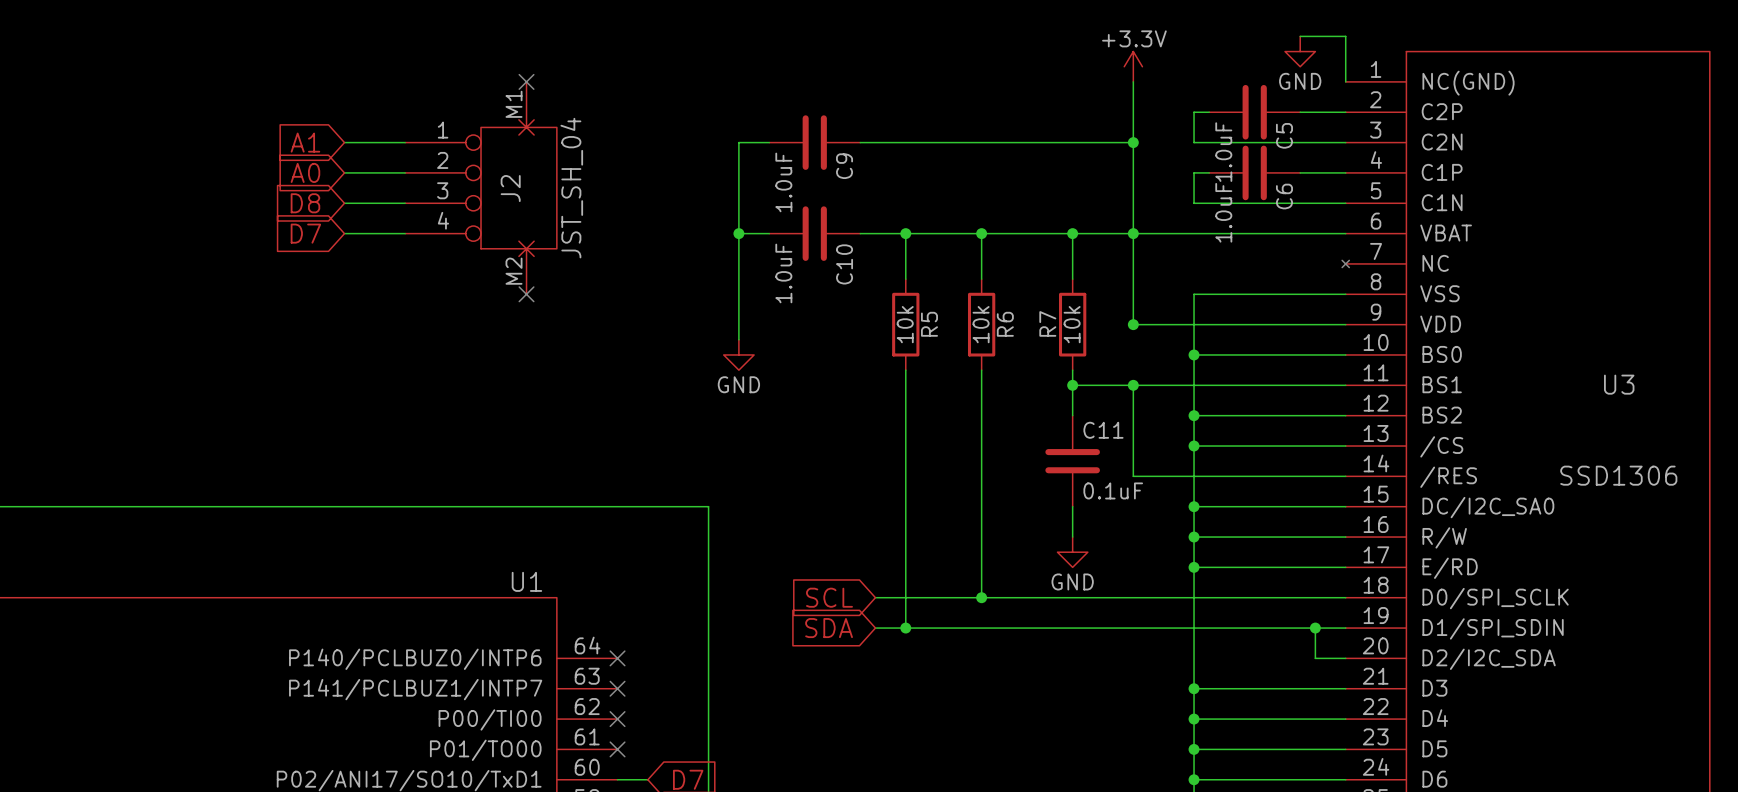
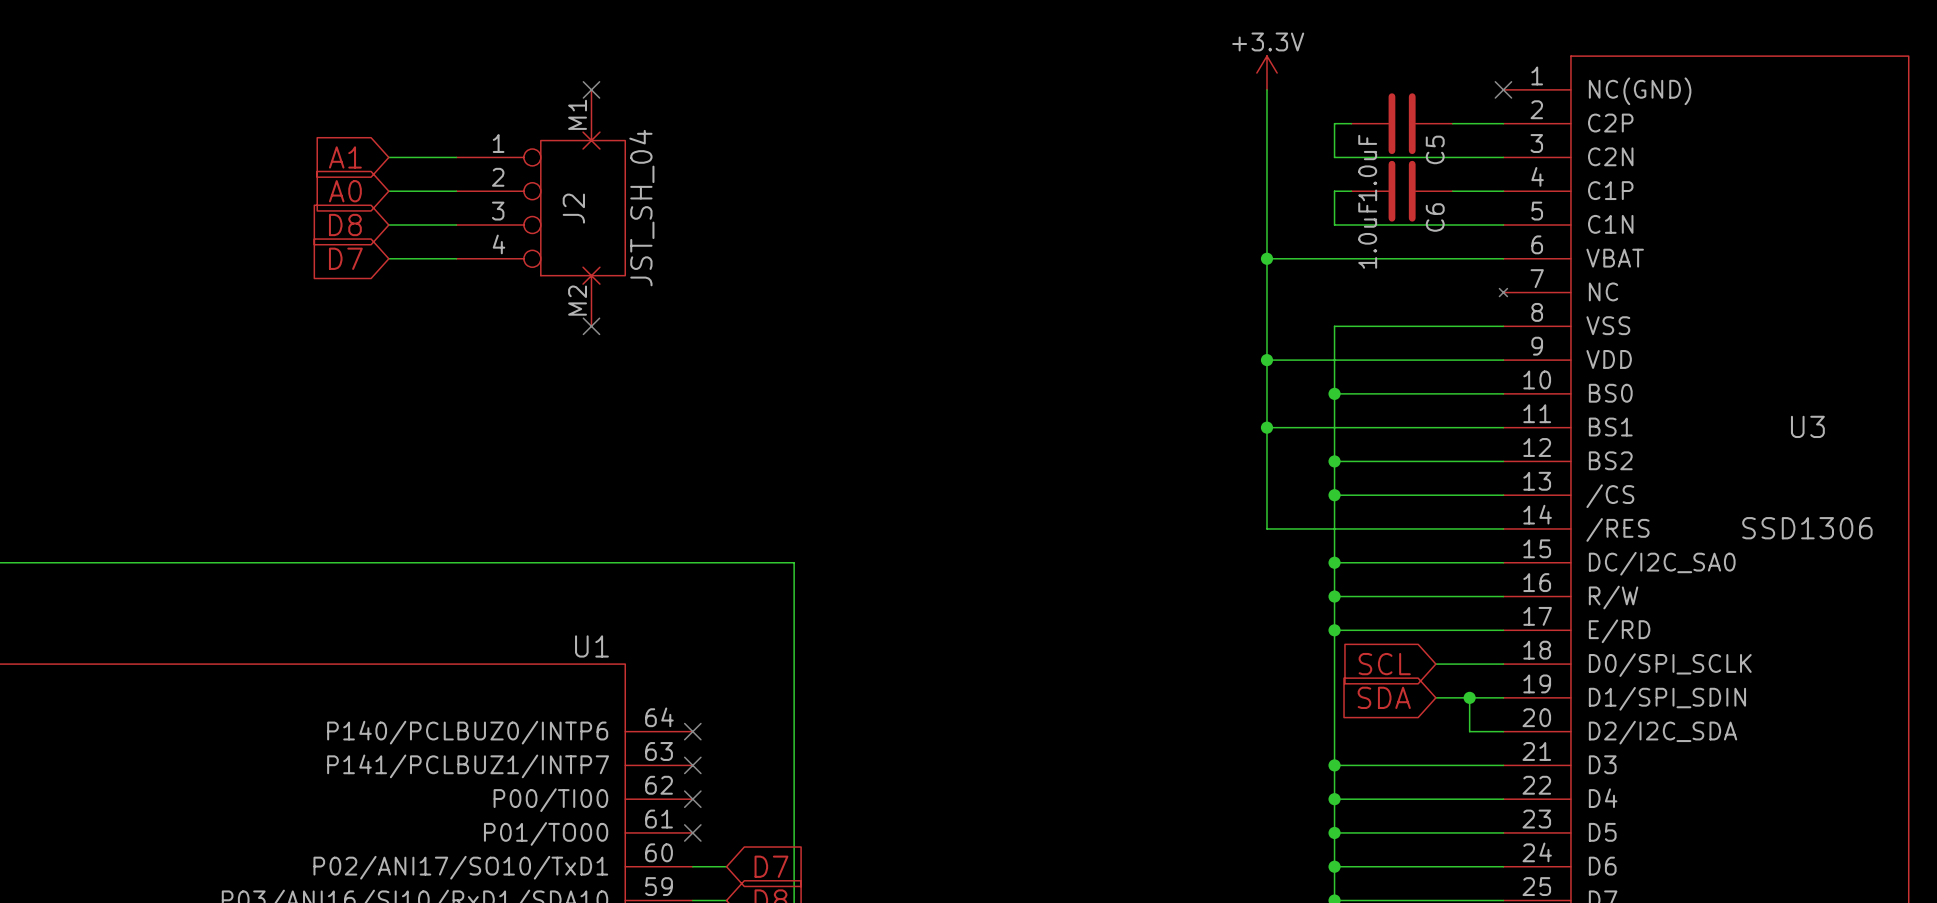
wire: (1300, 36) (1345, 36) (1345, 81) -> none
power symbol: GND (1300, 51) -> none
no-connect mark: none -> (1503, 89)
wire: (769, 142) (738, 142) (738, 339) -> none
C9: 1.0uF (814, 142) -> none
wire: (860, 142) (1133, 142) -> none
junction: (1133, 142) -> none
wire: (738, 233) (769, 233) -> none
junction: (738, 233) -> none
C10: 1.0uF (814, 233) -> none
wire: (860, 233) (1133, 233) -> none
wire: (905, 233) (905, 279) -> none
junction: (905, 233) -> none
wire: (981, 233) (981, 279) -> none
junction: (981, 233) -> none
wire: (1072, 233) (1072, 279) -> none
junction: (1072, 233) -> none
R5: 10k (905, 324) -> none
R6: 10k (981, 324) -> none
R7: 10k (1072, 324) -> none
power symbol: GND (738, 354) -> none
wire: (905, 370) (905, 628) -> none
wire: (981, 370) (981, 597) -> none
wire: (1072, 370) (1072, 415) -> none
wire: (1072, 385) (1133, 385) -> (1266, 360) (1266, 427)
junction: (1072, 385) -> none
C11: 0.1uF (1072, 461) -> none
wire: (1072, 506) (1072, 537) -> none
power symbol: GND (1072, 552) -> none
global label: SCL (829, 597) -> none
wire: (875, 597) (1285, 597) -> none
junction: (981, 597) -> none
global label: none -> SCL (1384, 664)
global label: SDA (829, 628) -> none
wire: (875, 628) (1285, 628) -> none
junction: (905, 628) -> none
global label: none -> SDA (1384, 697)

